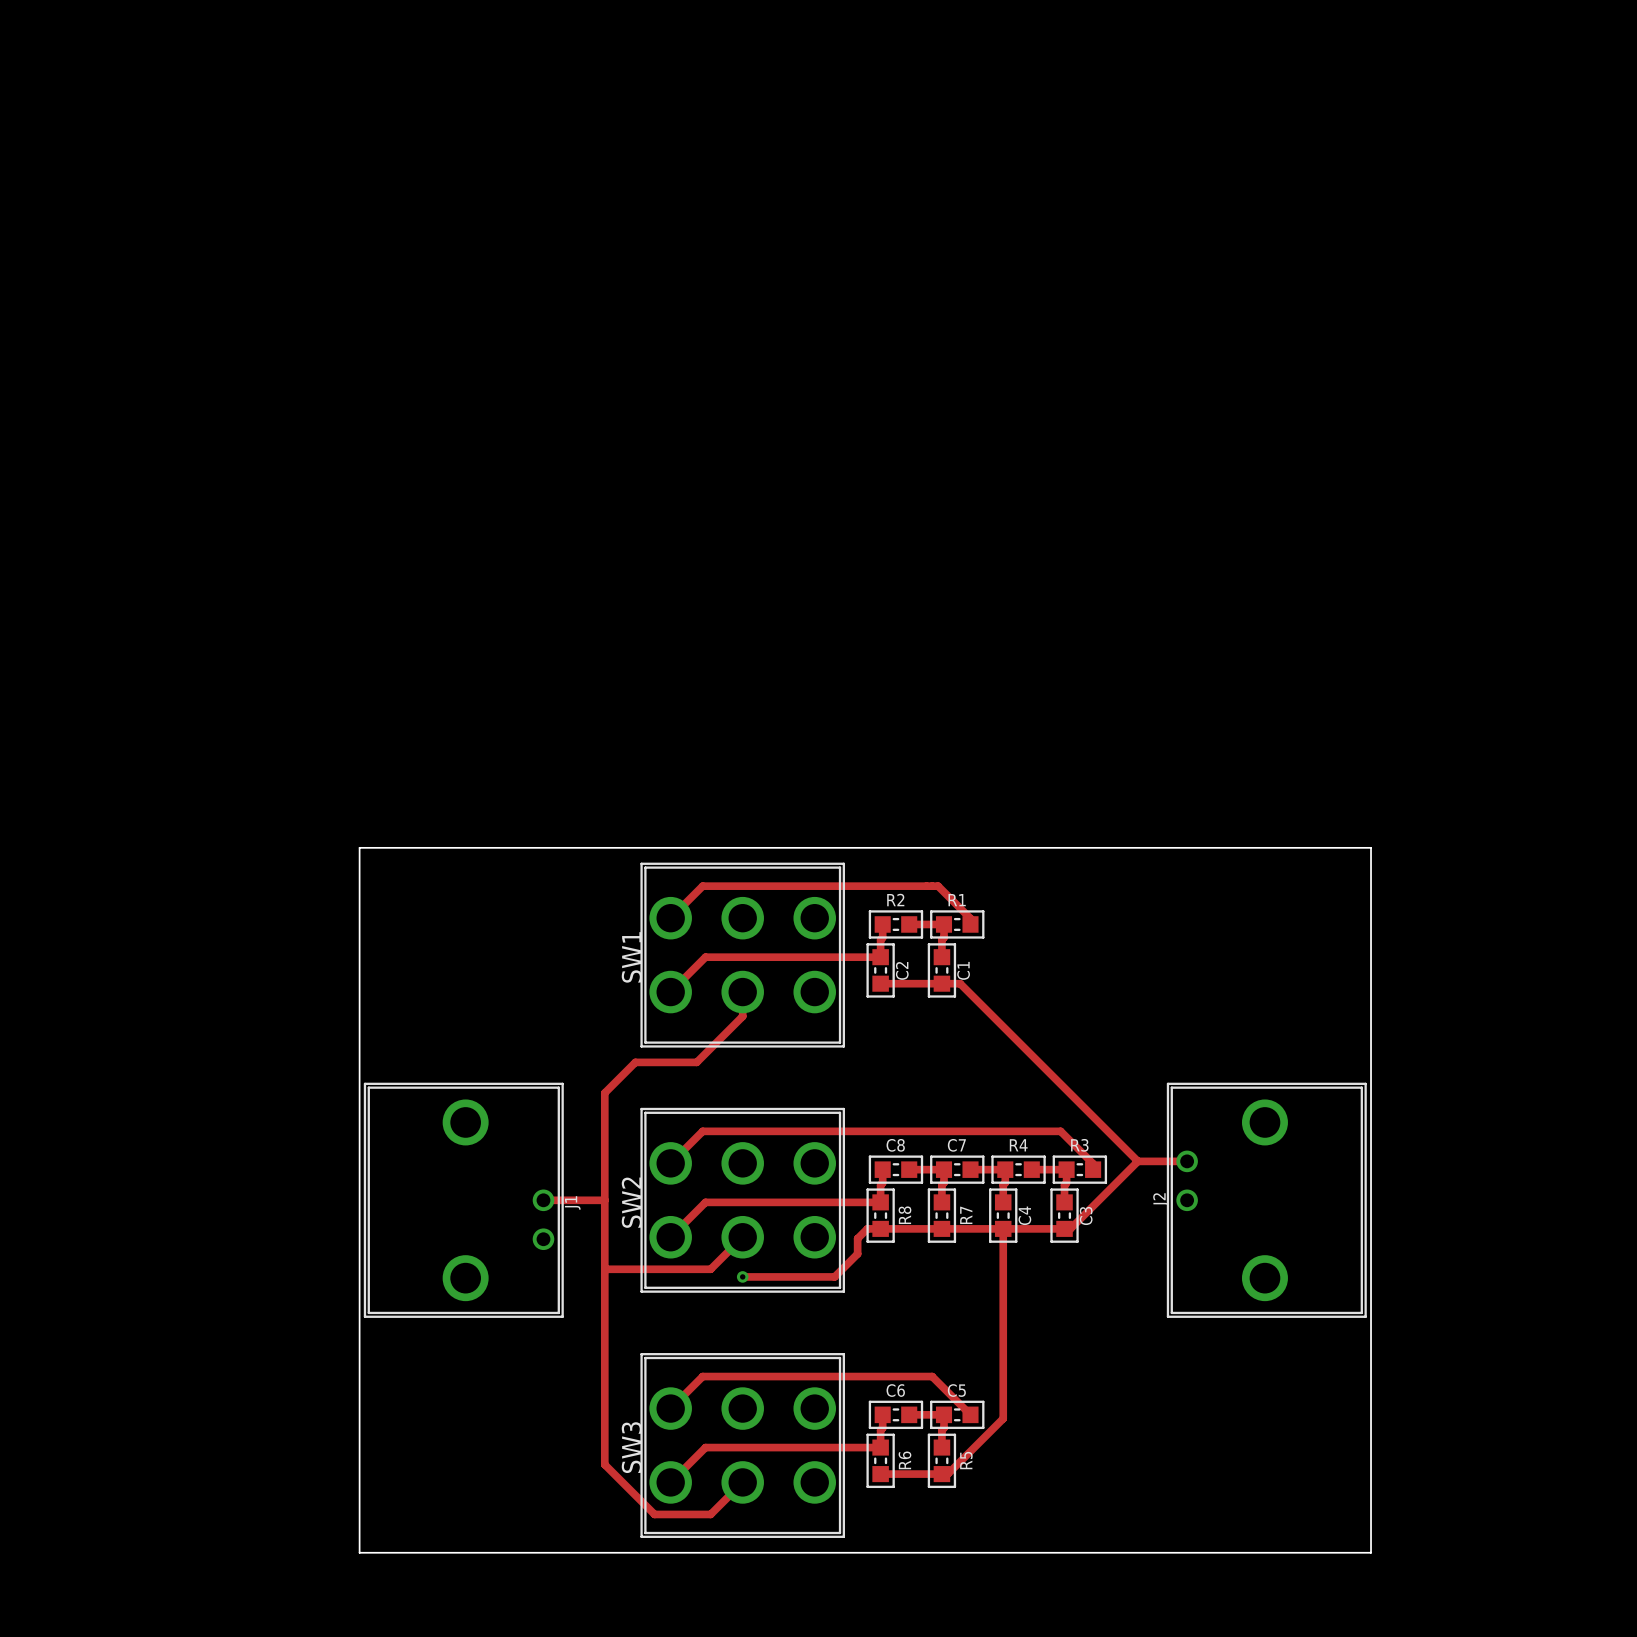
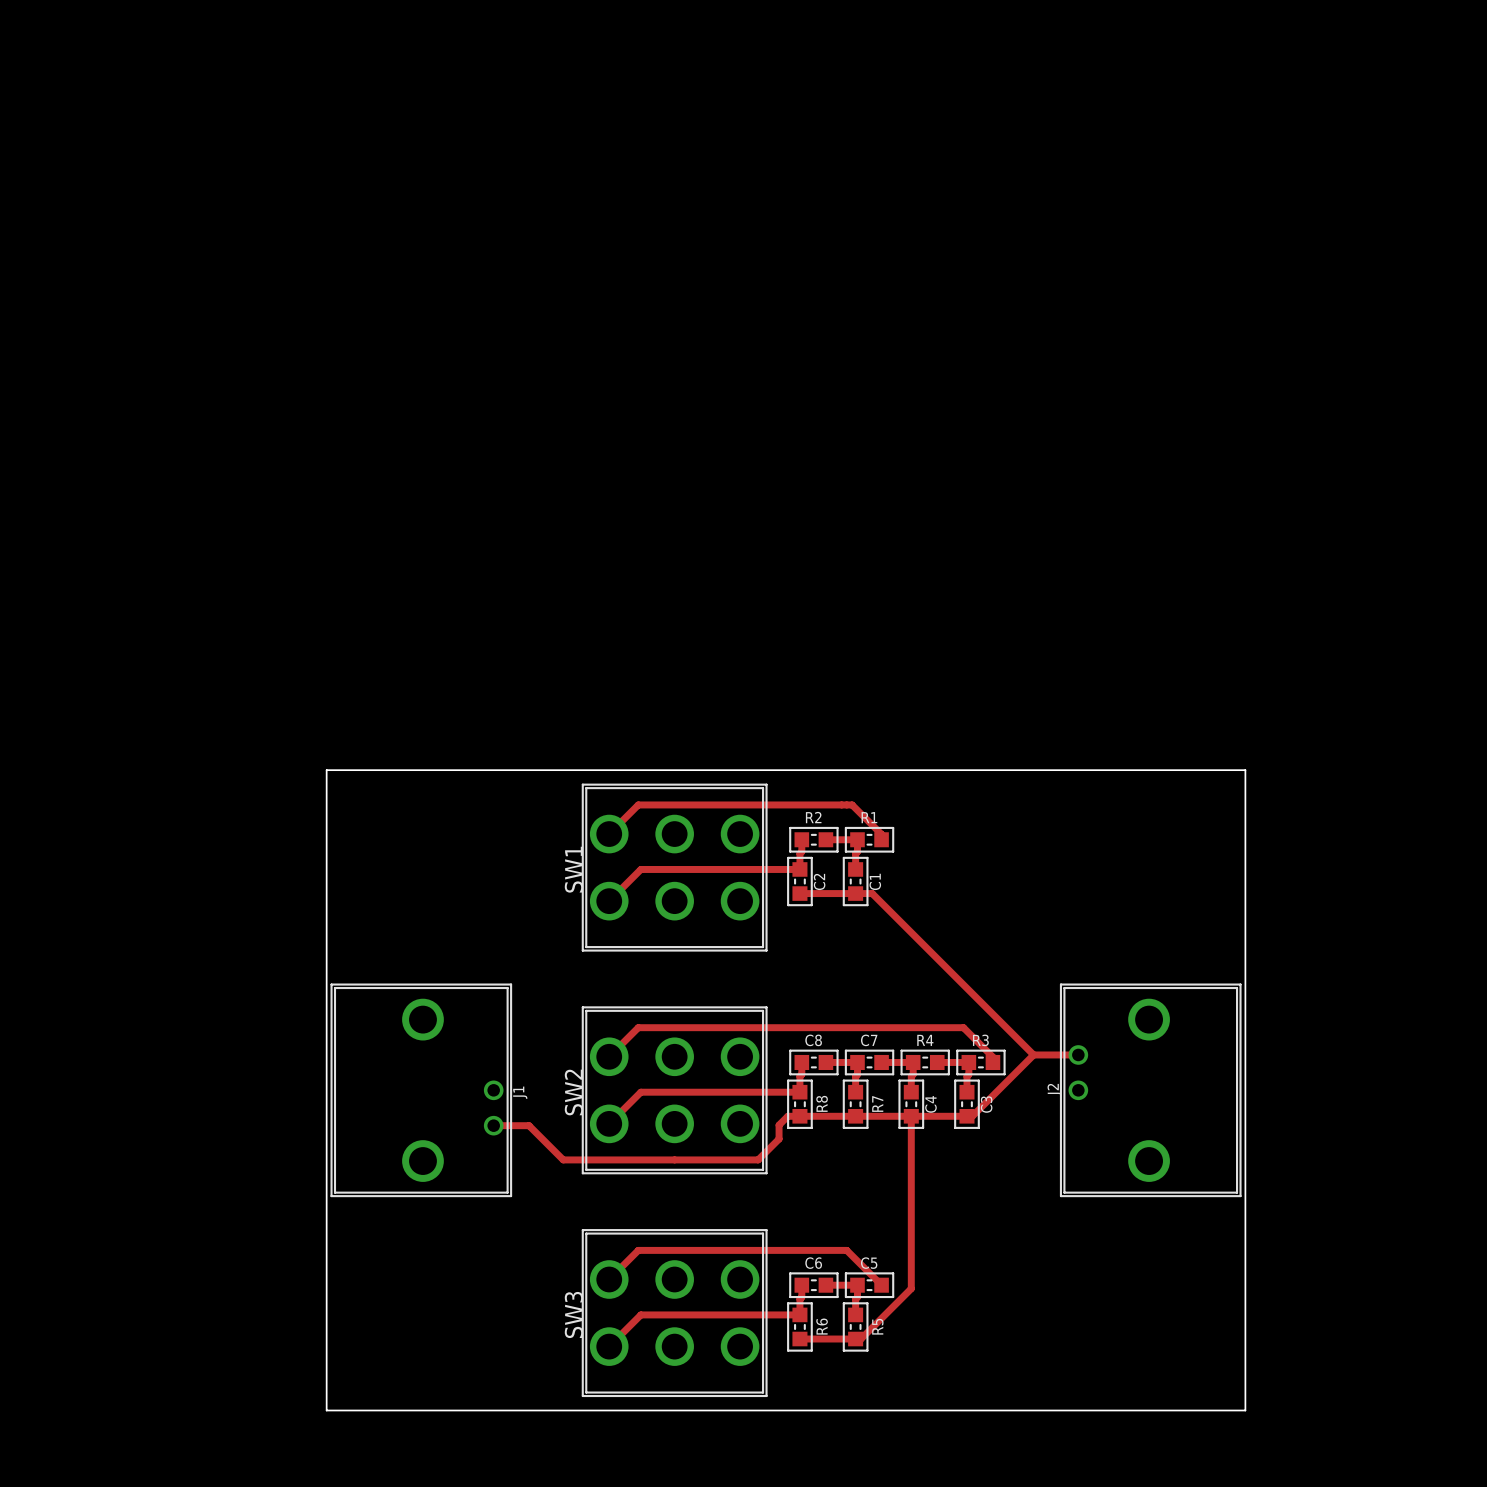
track: (742, 992) (742, 1016) (696, 1062) (635, 1062) (604, 1093) (604, 1464) (654, 1514) (710, 1514) (742, 1482) -> none
track: (543, 1200) (604, 1200) -> none
track: (742, 1237) (710, 1269) (604, 1269) -> none
track: none -> (493, 1125) (529, 1125) (563, 1159) (674, 1159)
via: (742, 1276) -> none

